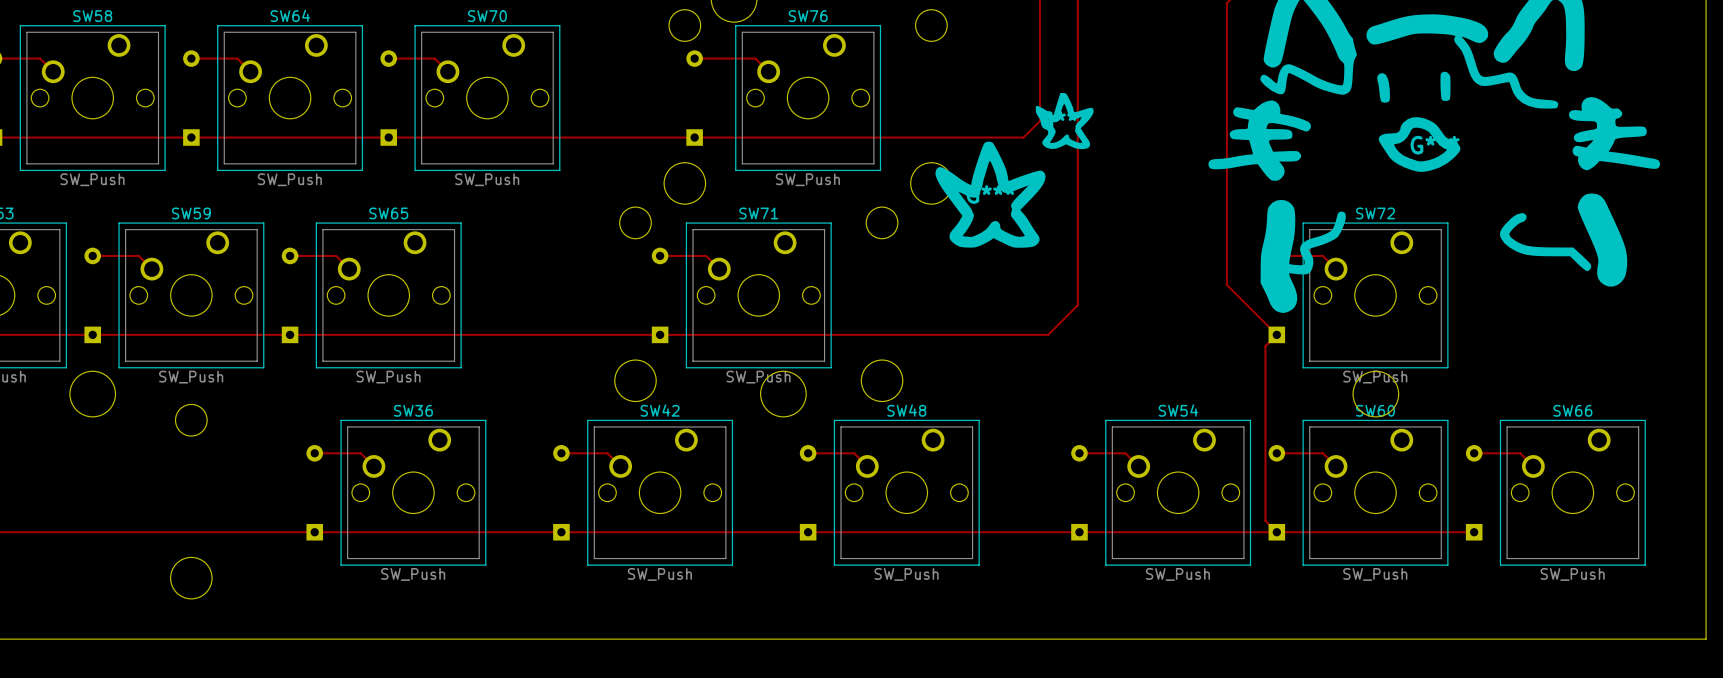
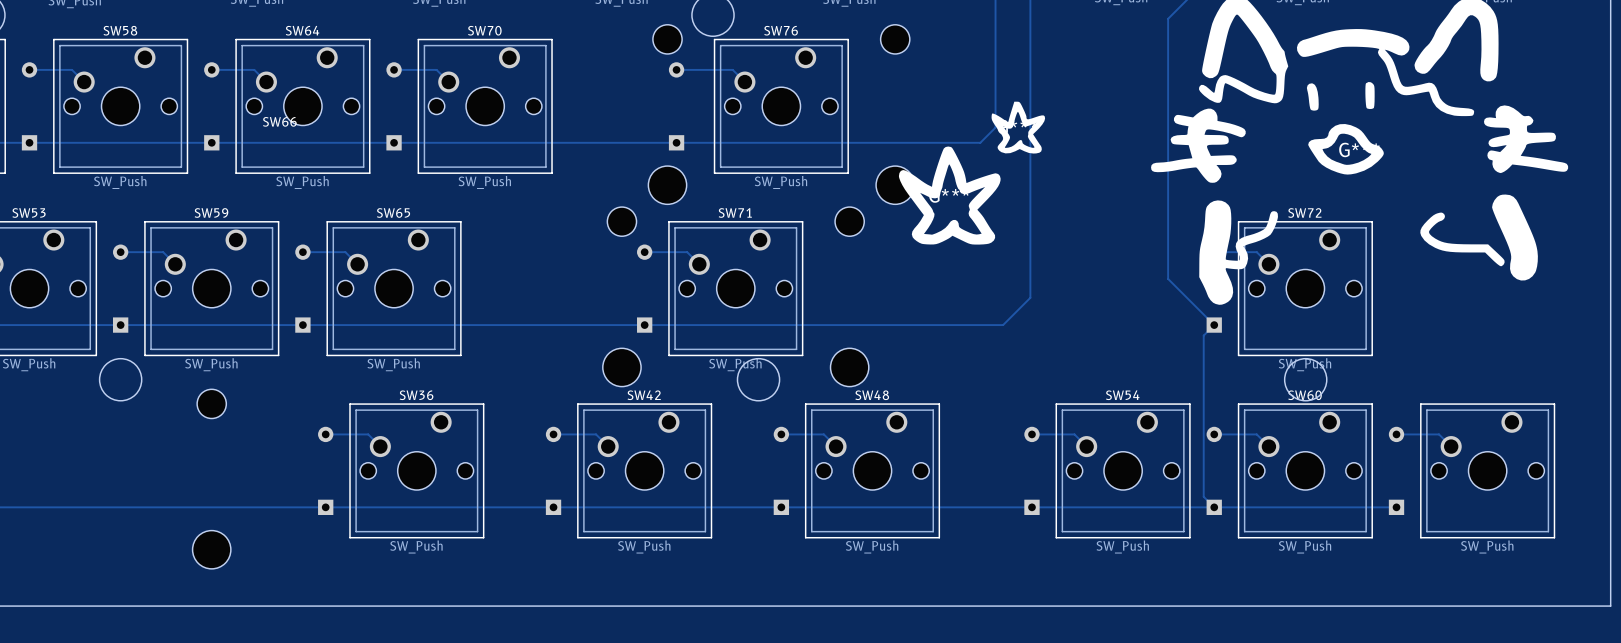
SW66 name position: SW66 (1572, 410) -> SW66 (279, 121)

